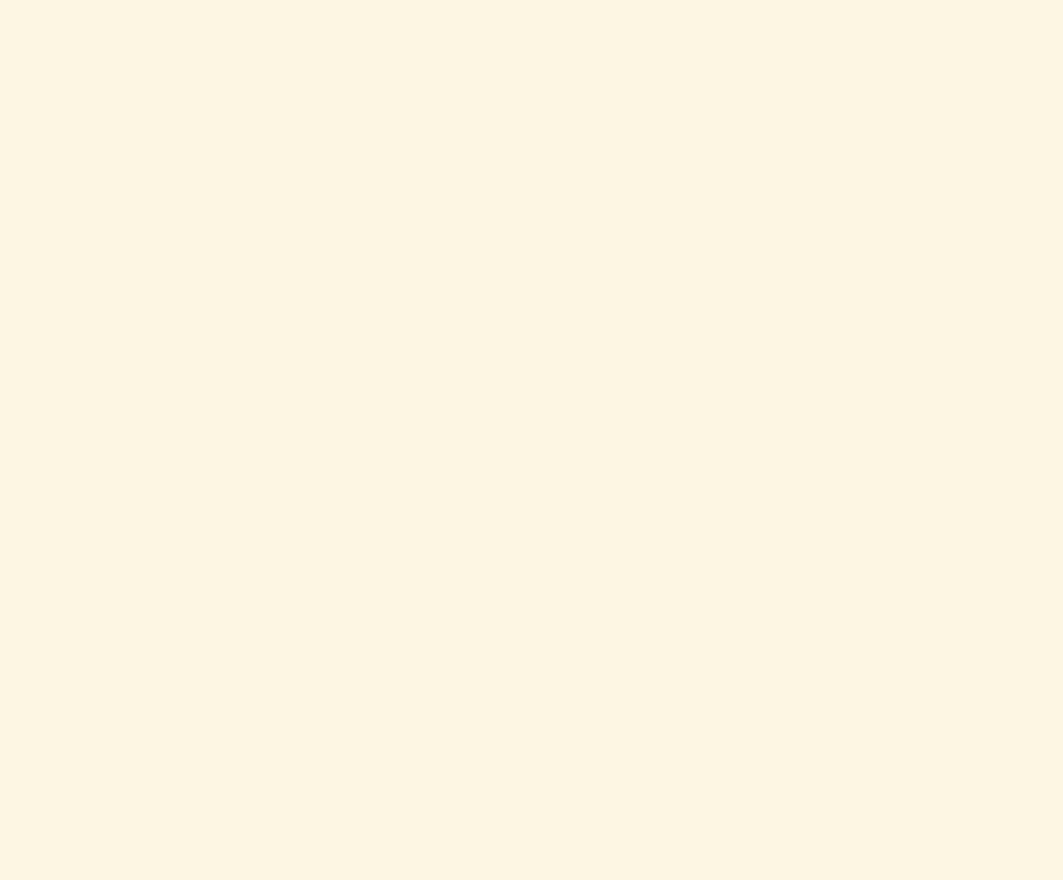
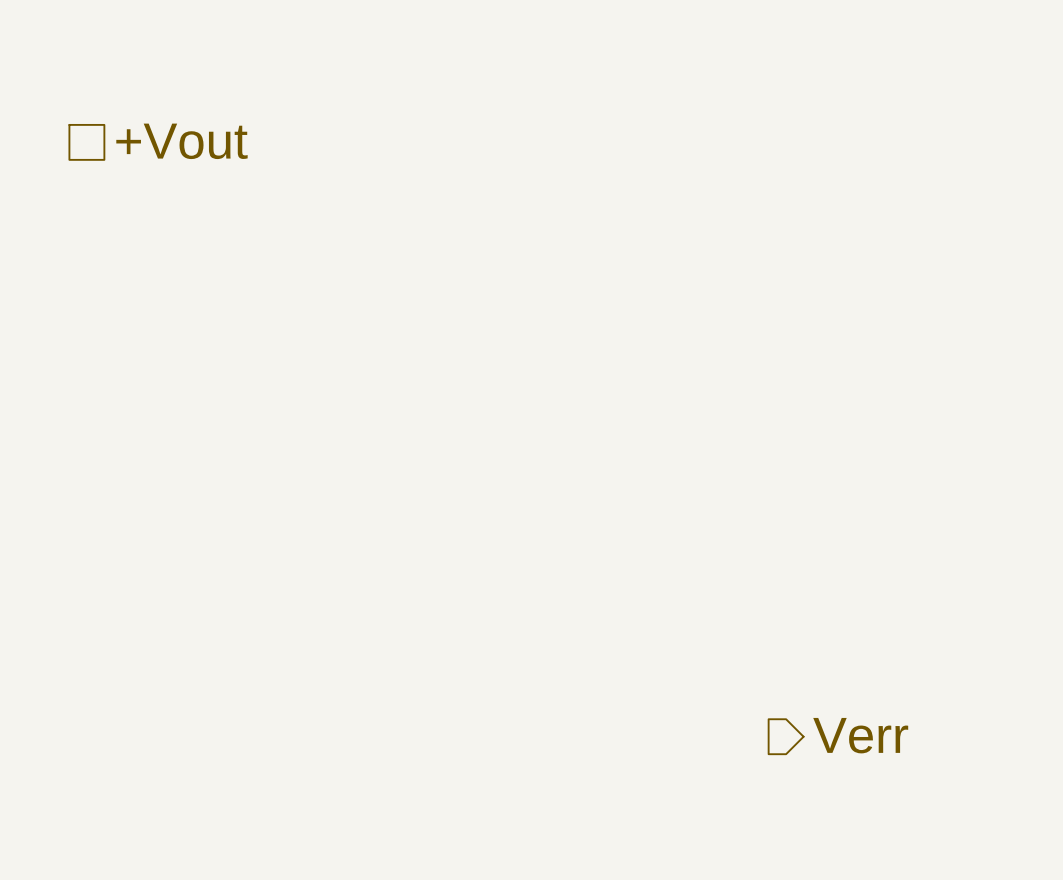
hierarchical label: none -> +Vout (181, 141)
hierarchical label: none -> Verr (860, 735)

